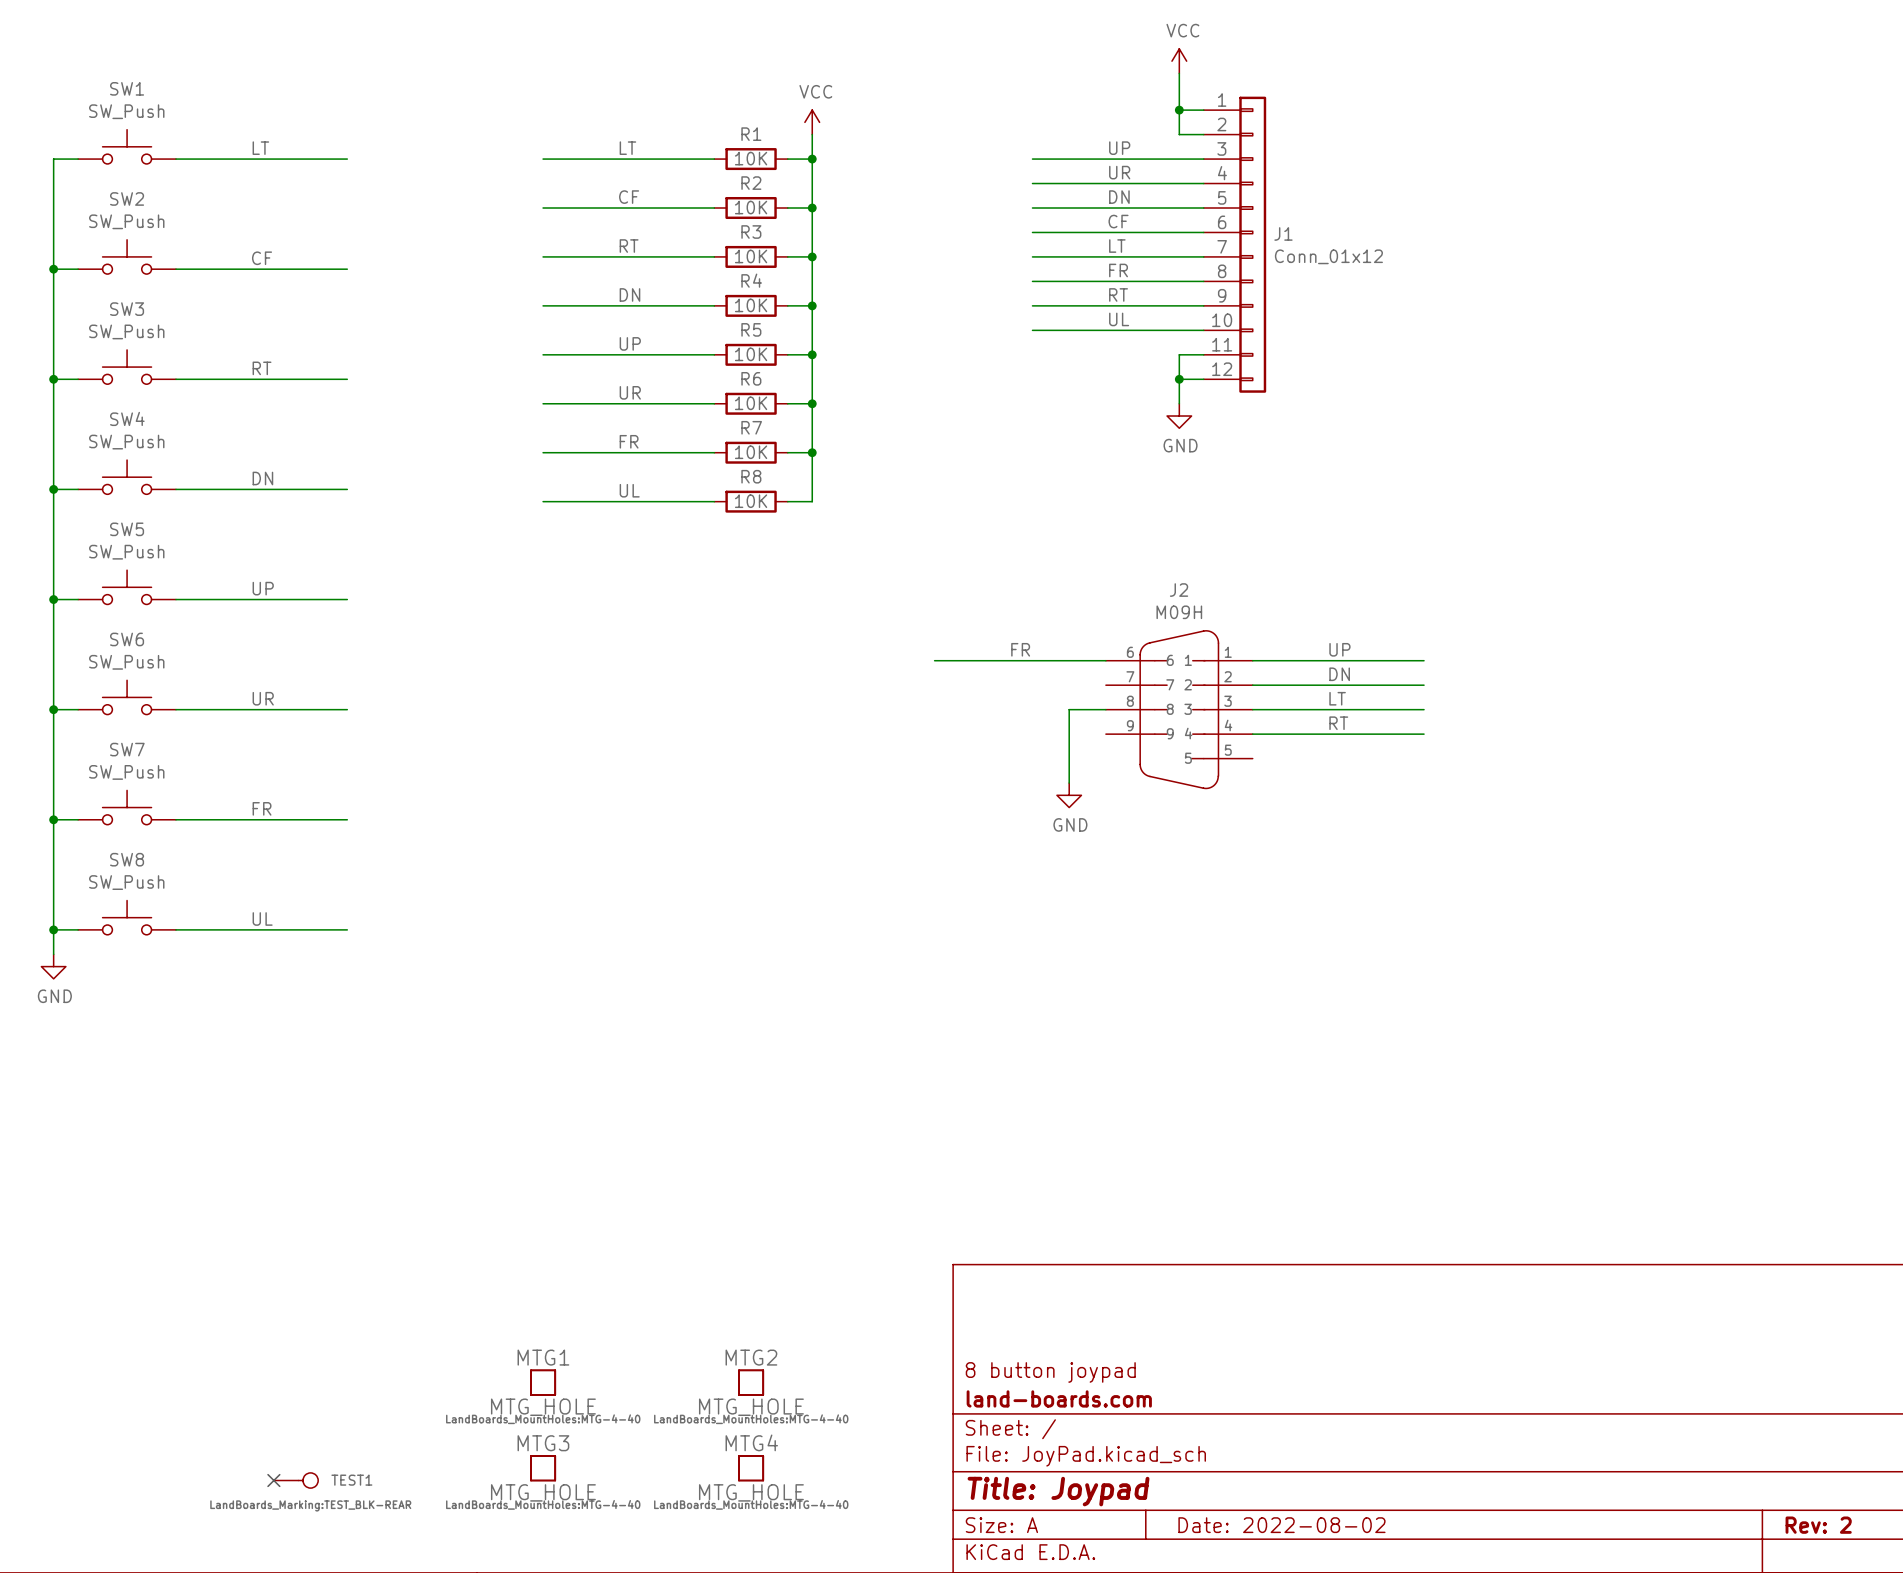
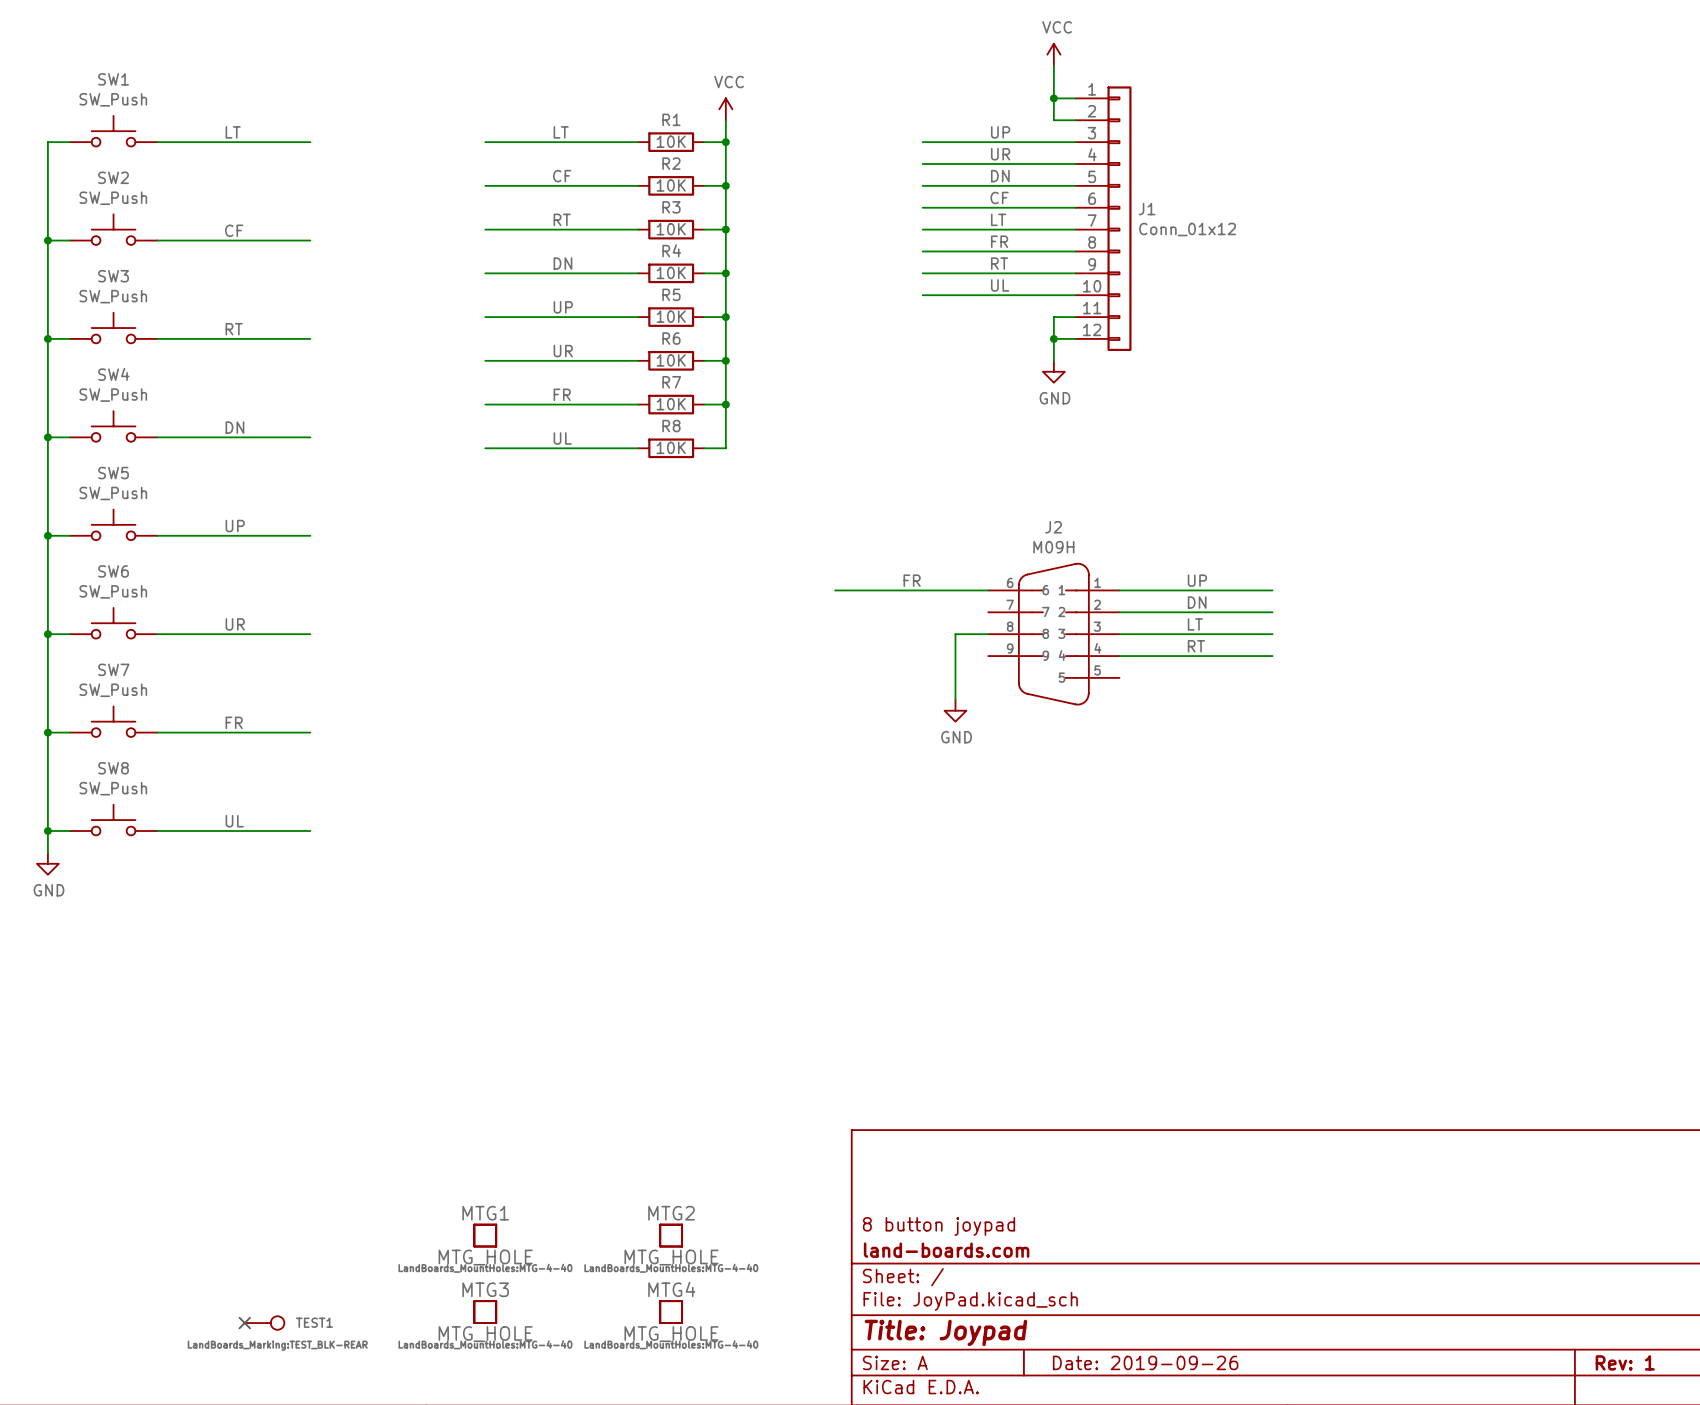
title block: Date: 2022-08-02 (1281, 1525) -> Date: 2019-09-26 (1145, 1362)
title block: Rev: 2 (1818, 1525) -> Rev: 1 (1625, 1362)

